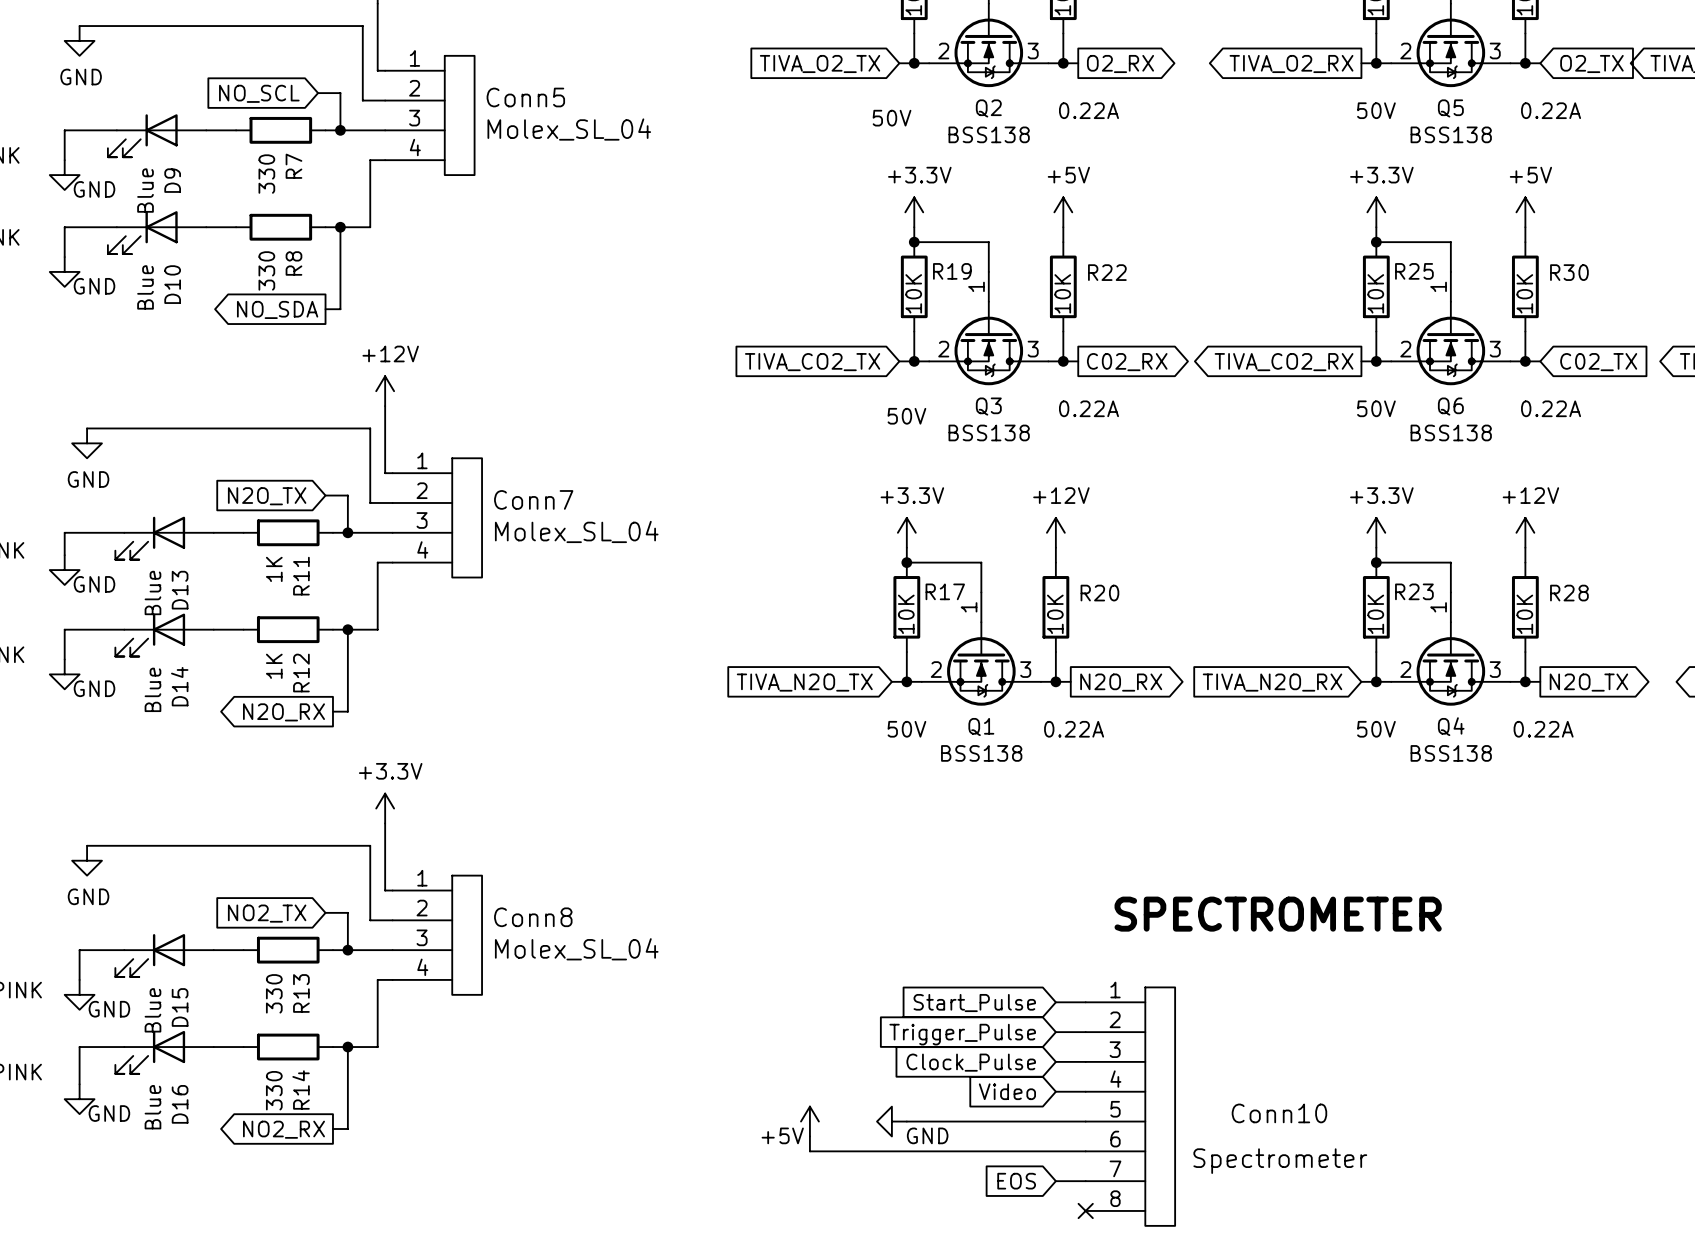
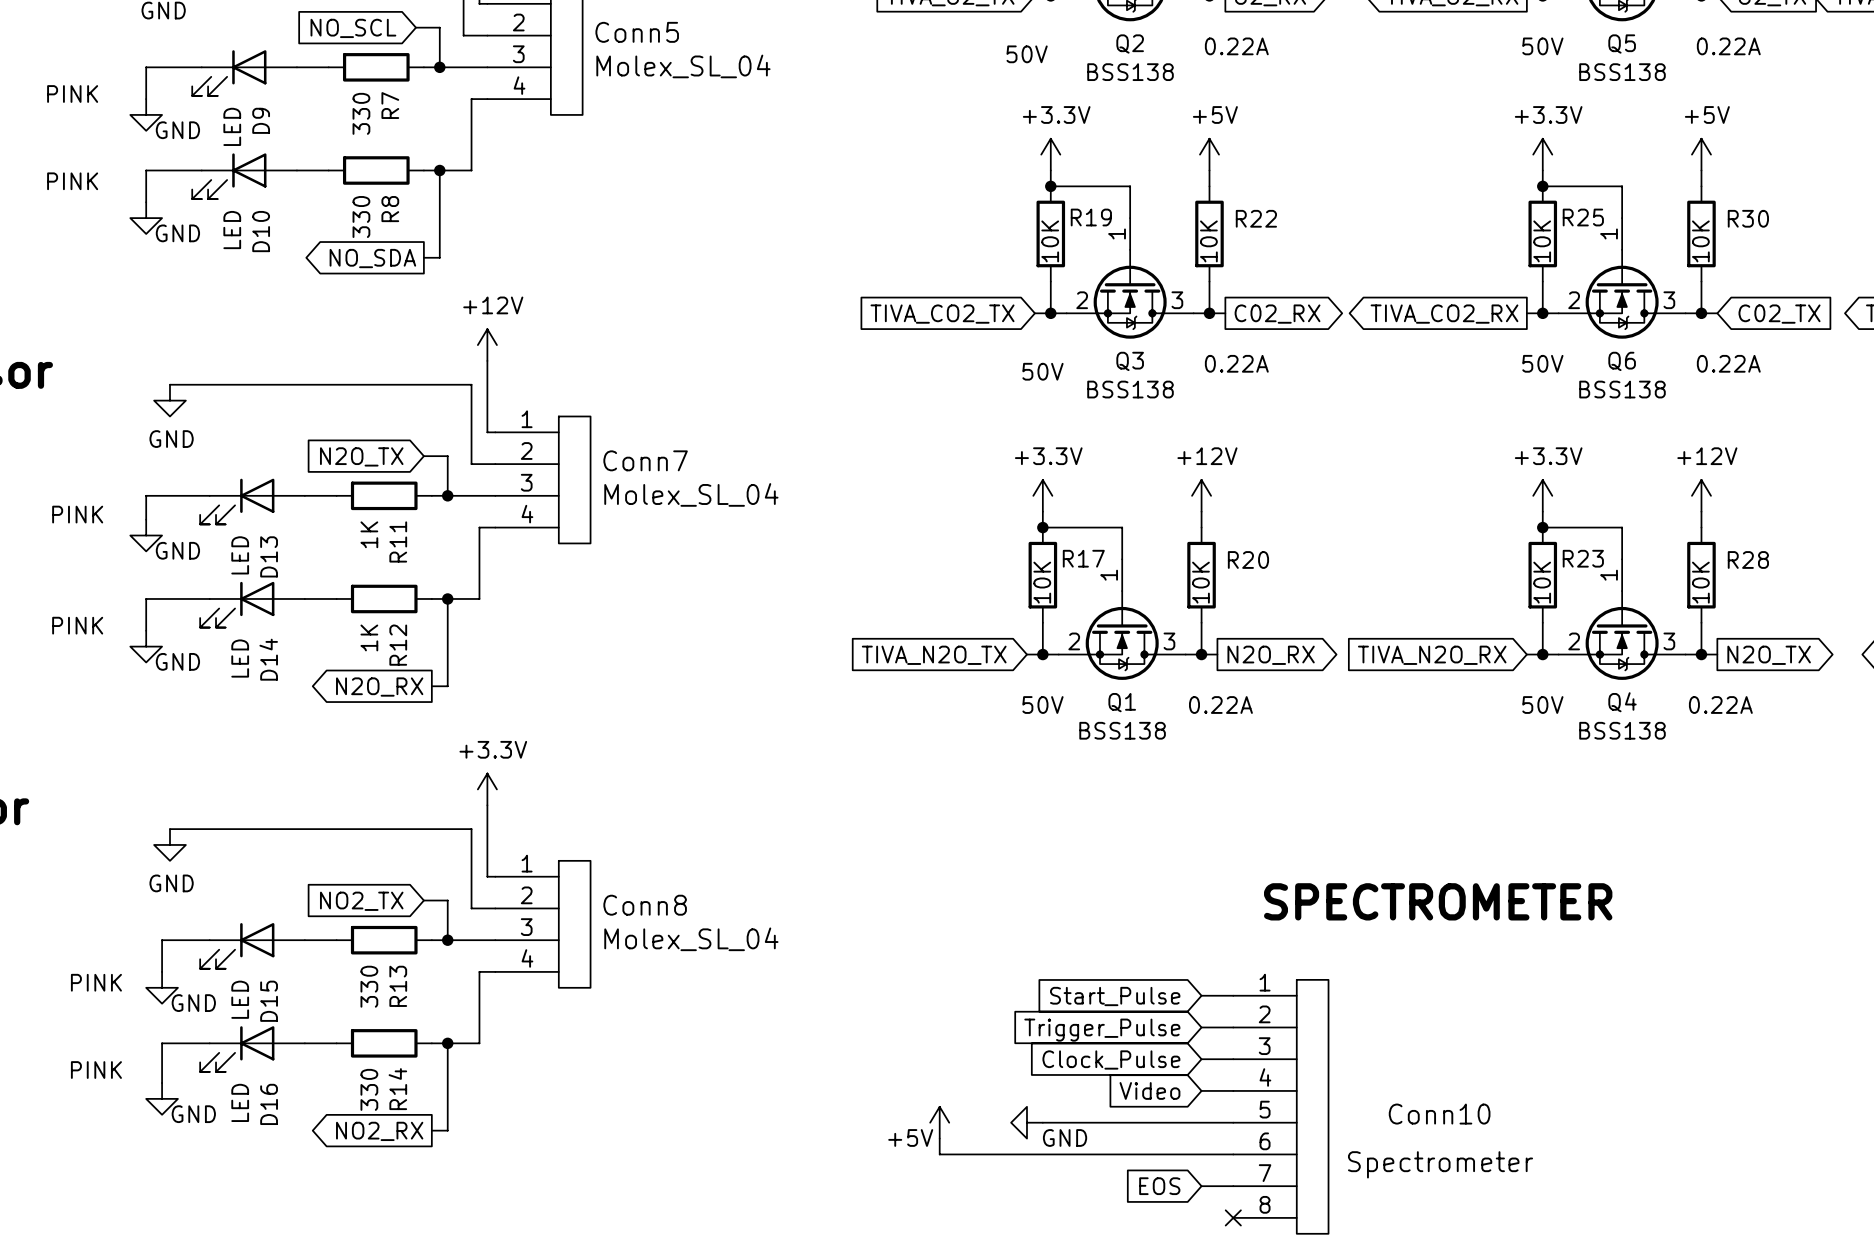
D9 value: Blue (145, 190) -> LED (232, 126)
D10 value: Blue (145, 287) -> LED (232, 230)
D13 value: Blue (152, 592) -> LED (240, 555)
D14 value: Blue (152, 689) -> LED (240, 658)
D15 value: Blue (152, 1010) -> LED (240, 999)
D16 value: Blue (152, 1107) -> LED (240, 1102)

